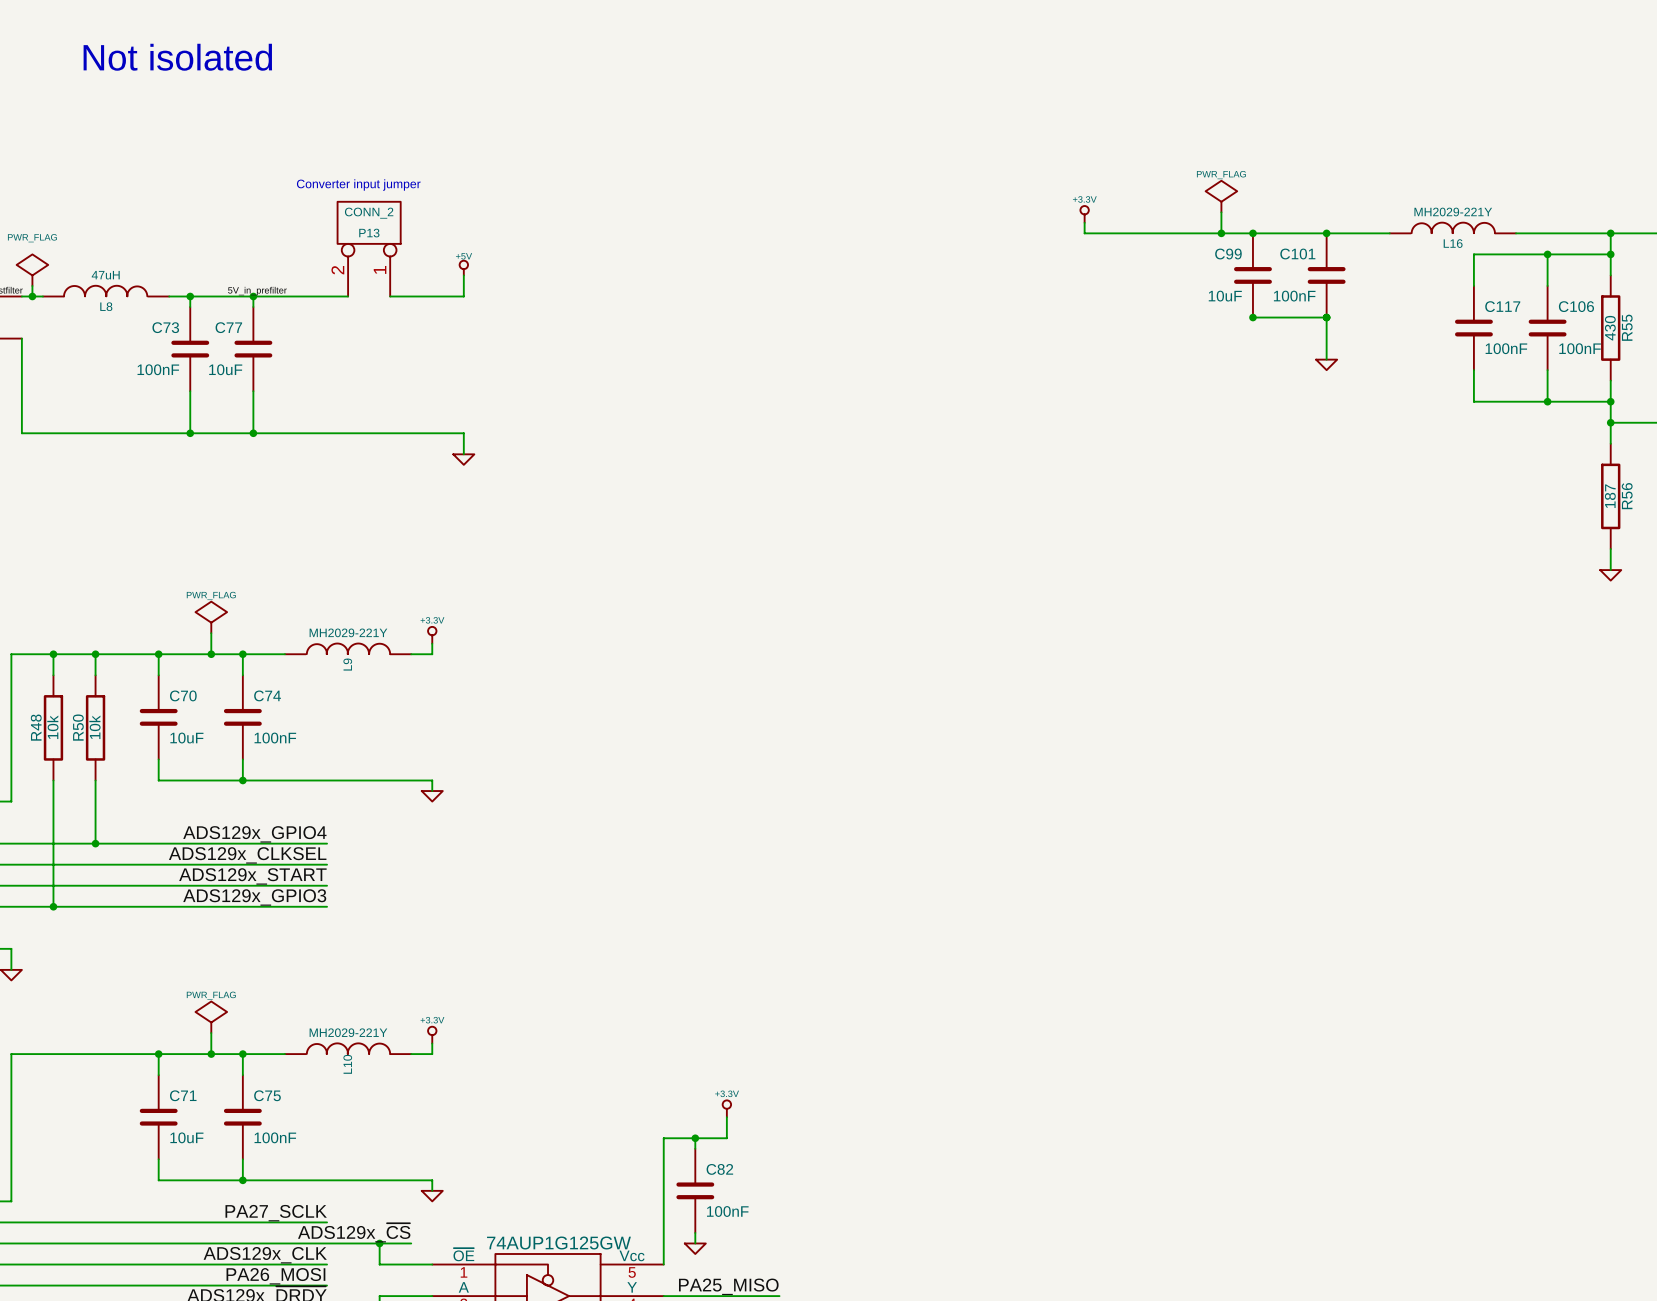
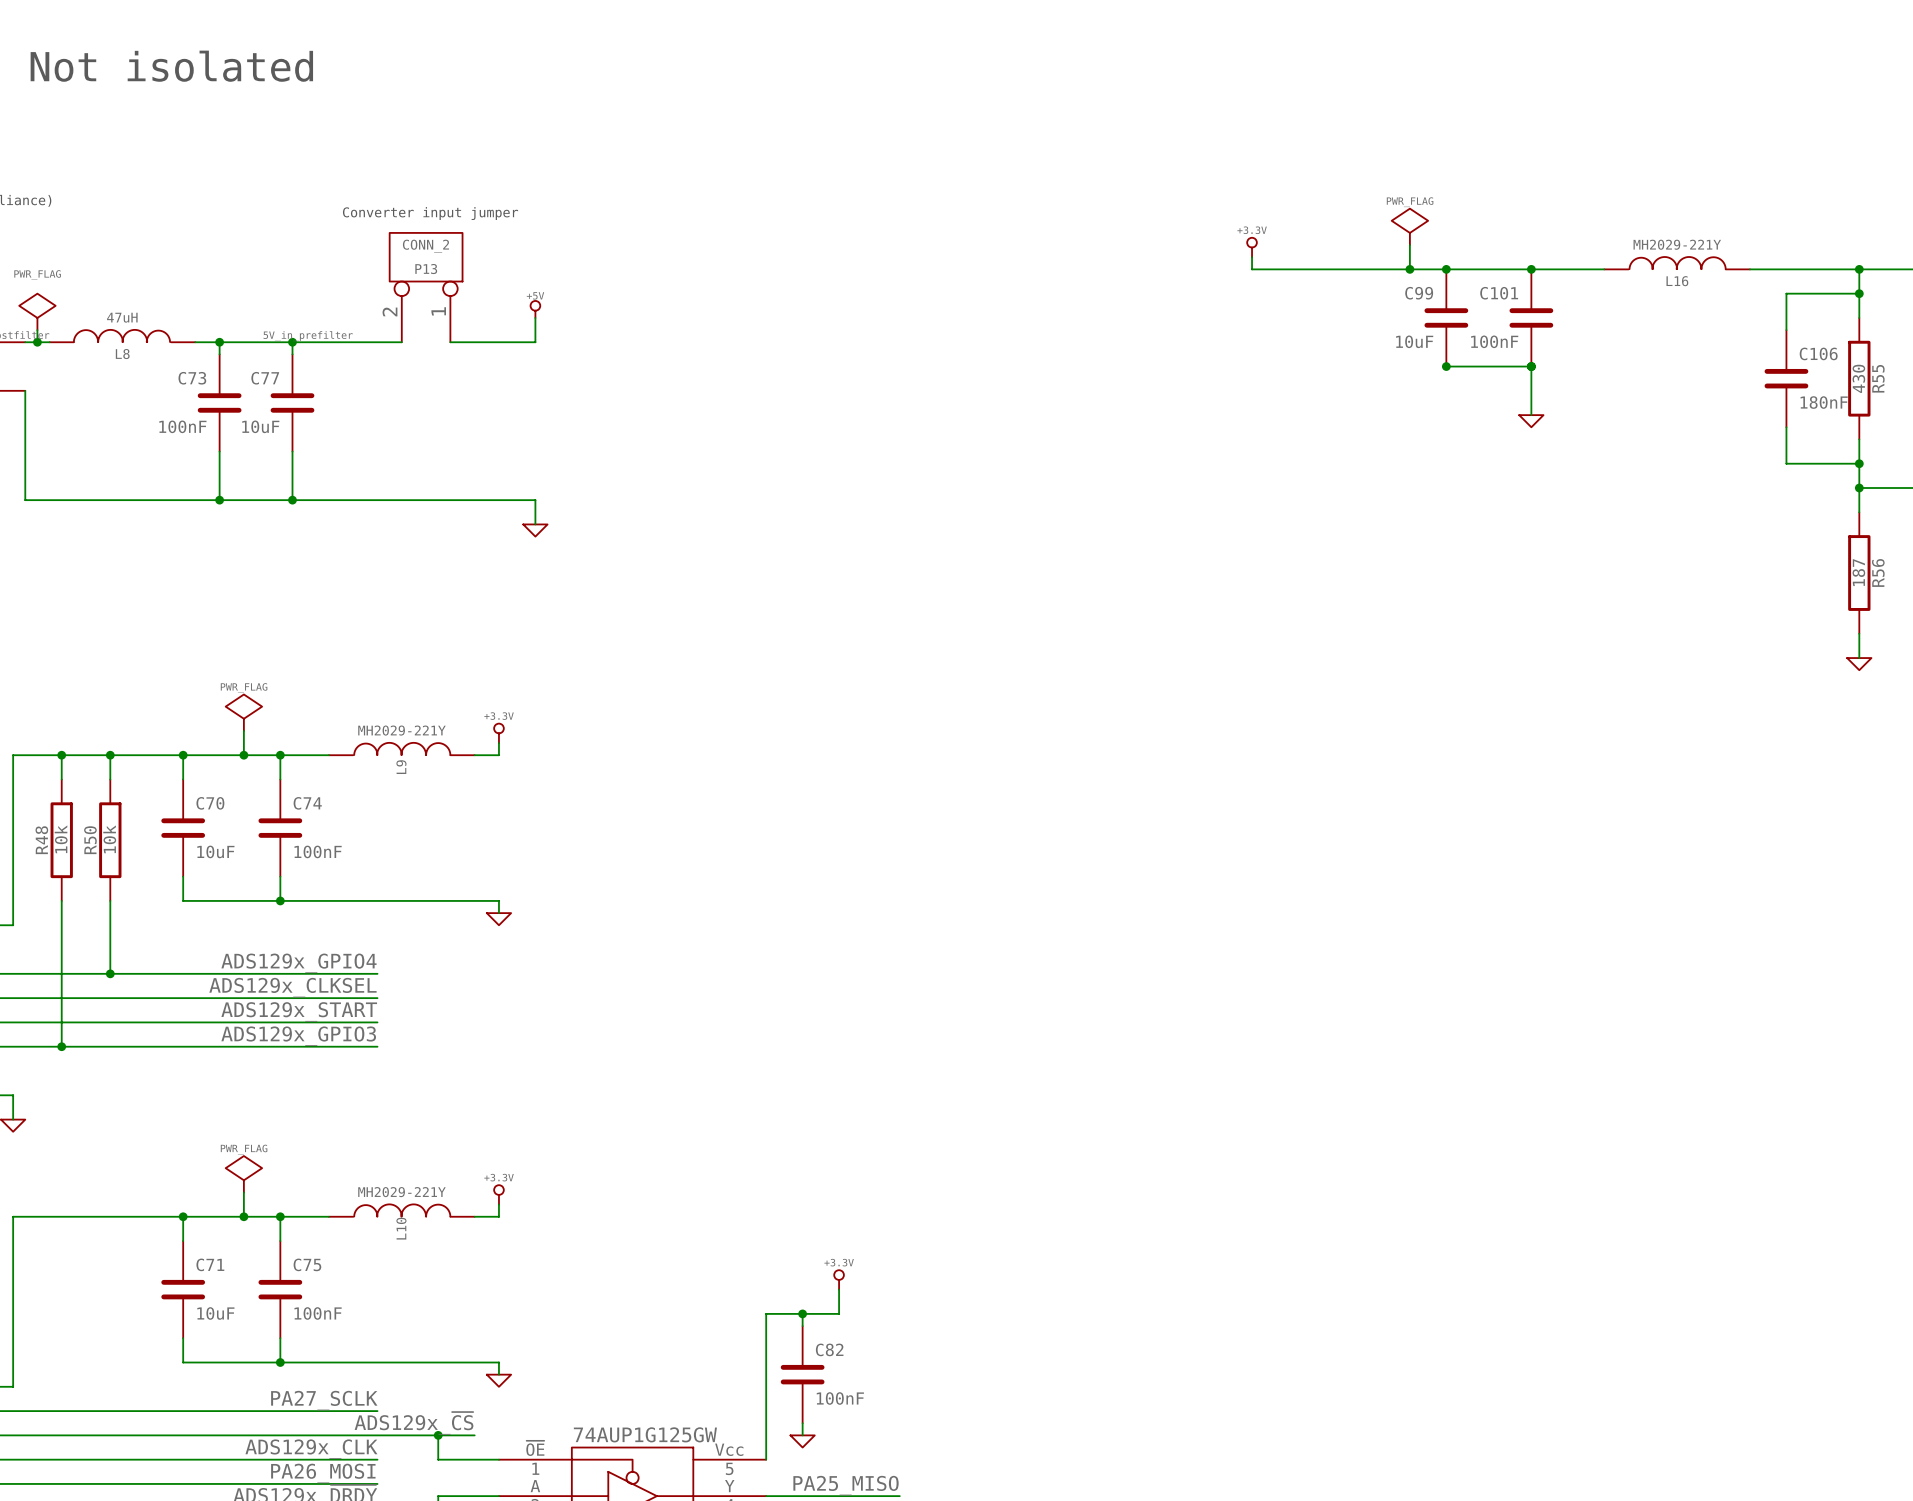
wire: (1547, 254) (1473, 254) (1473, 285) -> none
junction: (1547, 254) -> none
C117: 100nF (1473, 328) -> none
C106 value: 100nF (1580, 348) -> 180nF (1824, 402)
wire: (1473, 370) (1473, 401) (1547, 401) -> none
junction: (1547, 401) -> none

